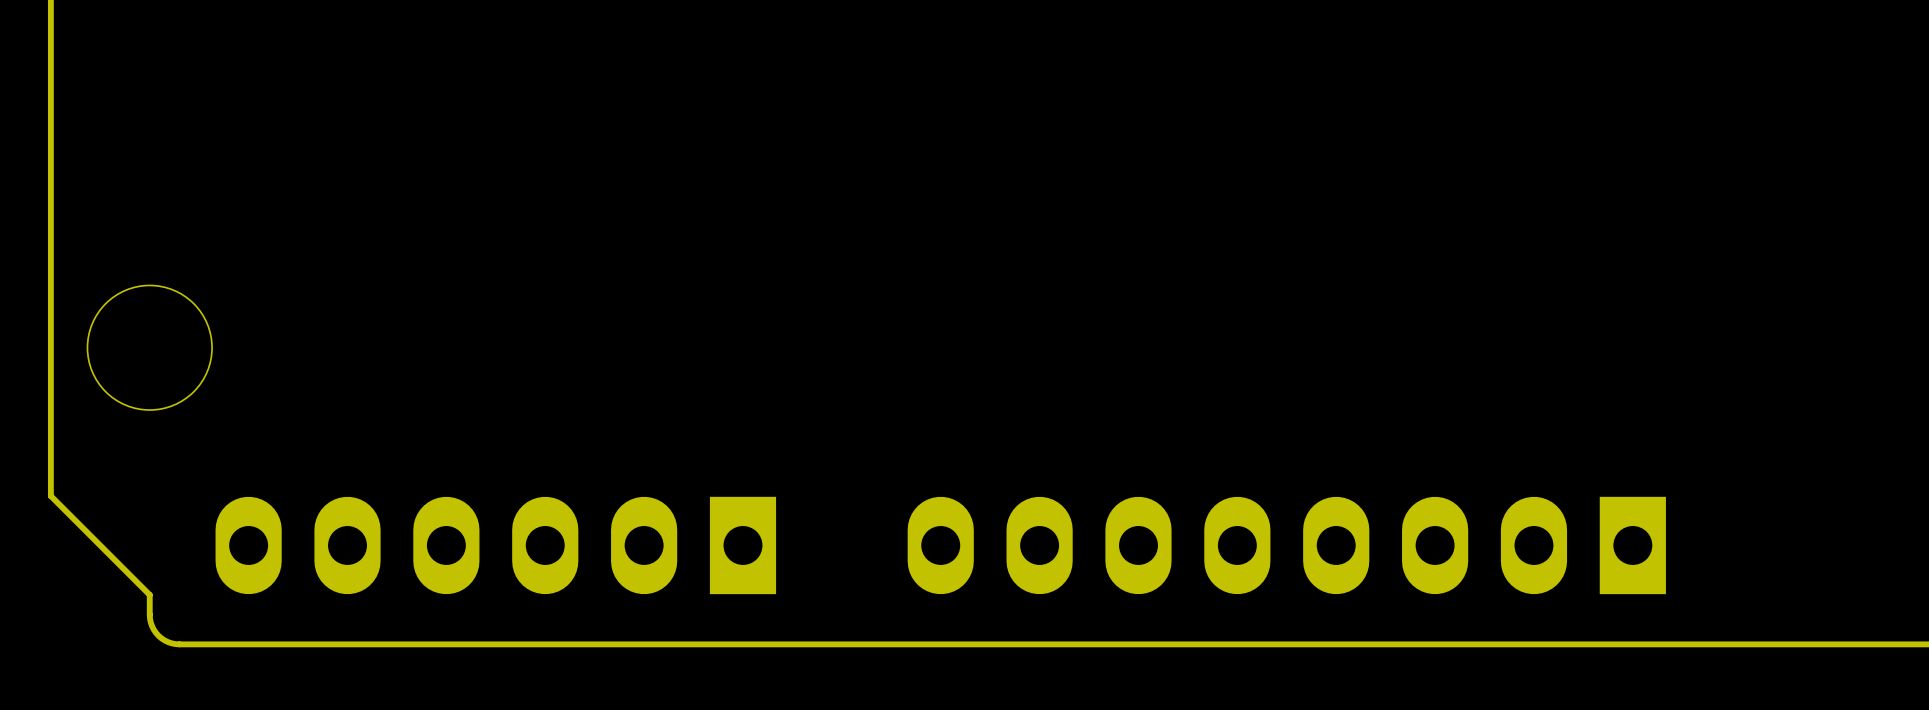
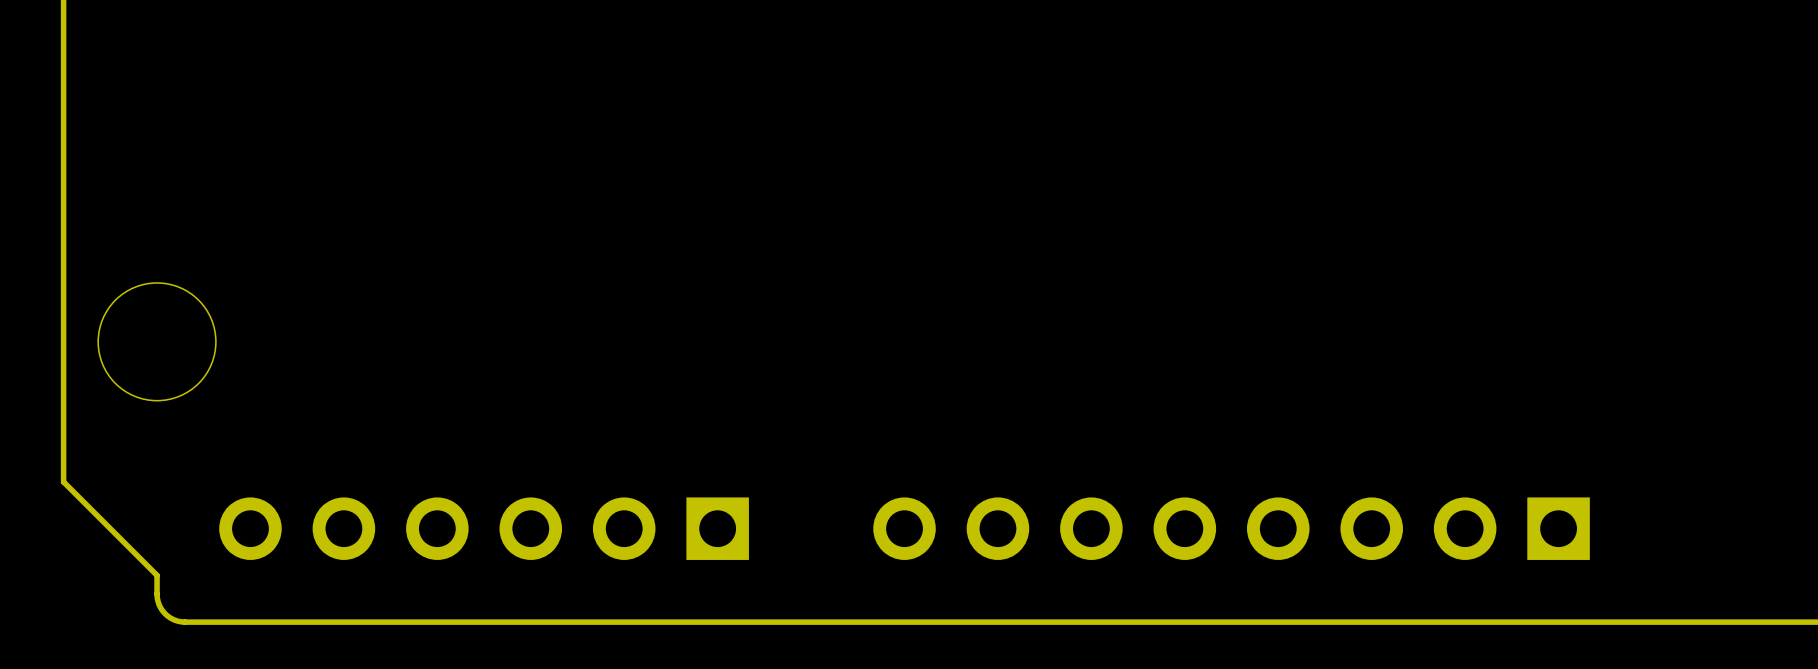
part footprint: [215, 496, 777, 595] -> [219, 497, 749, 560]
part footprint: [907, 496, 1666, 595] -> [873, 497, 1590, 560]

